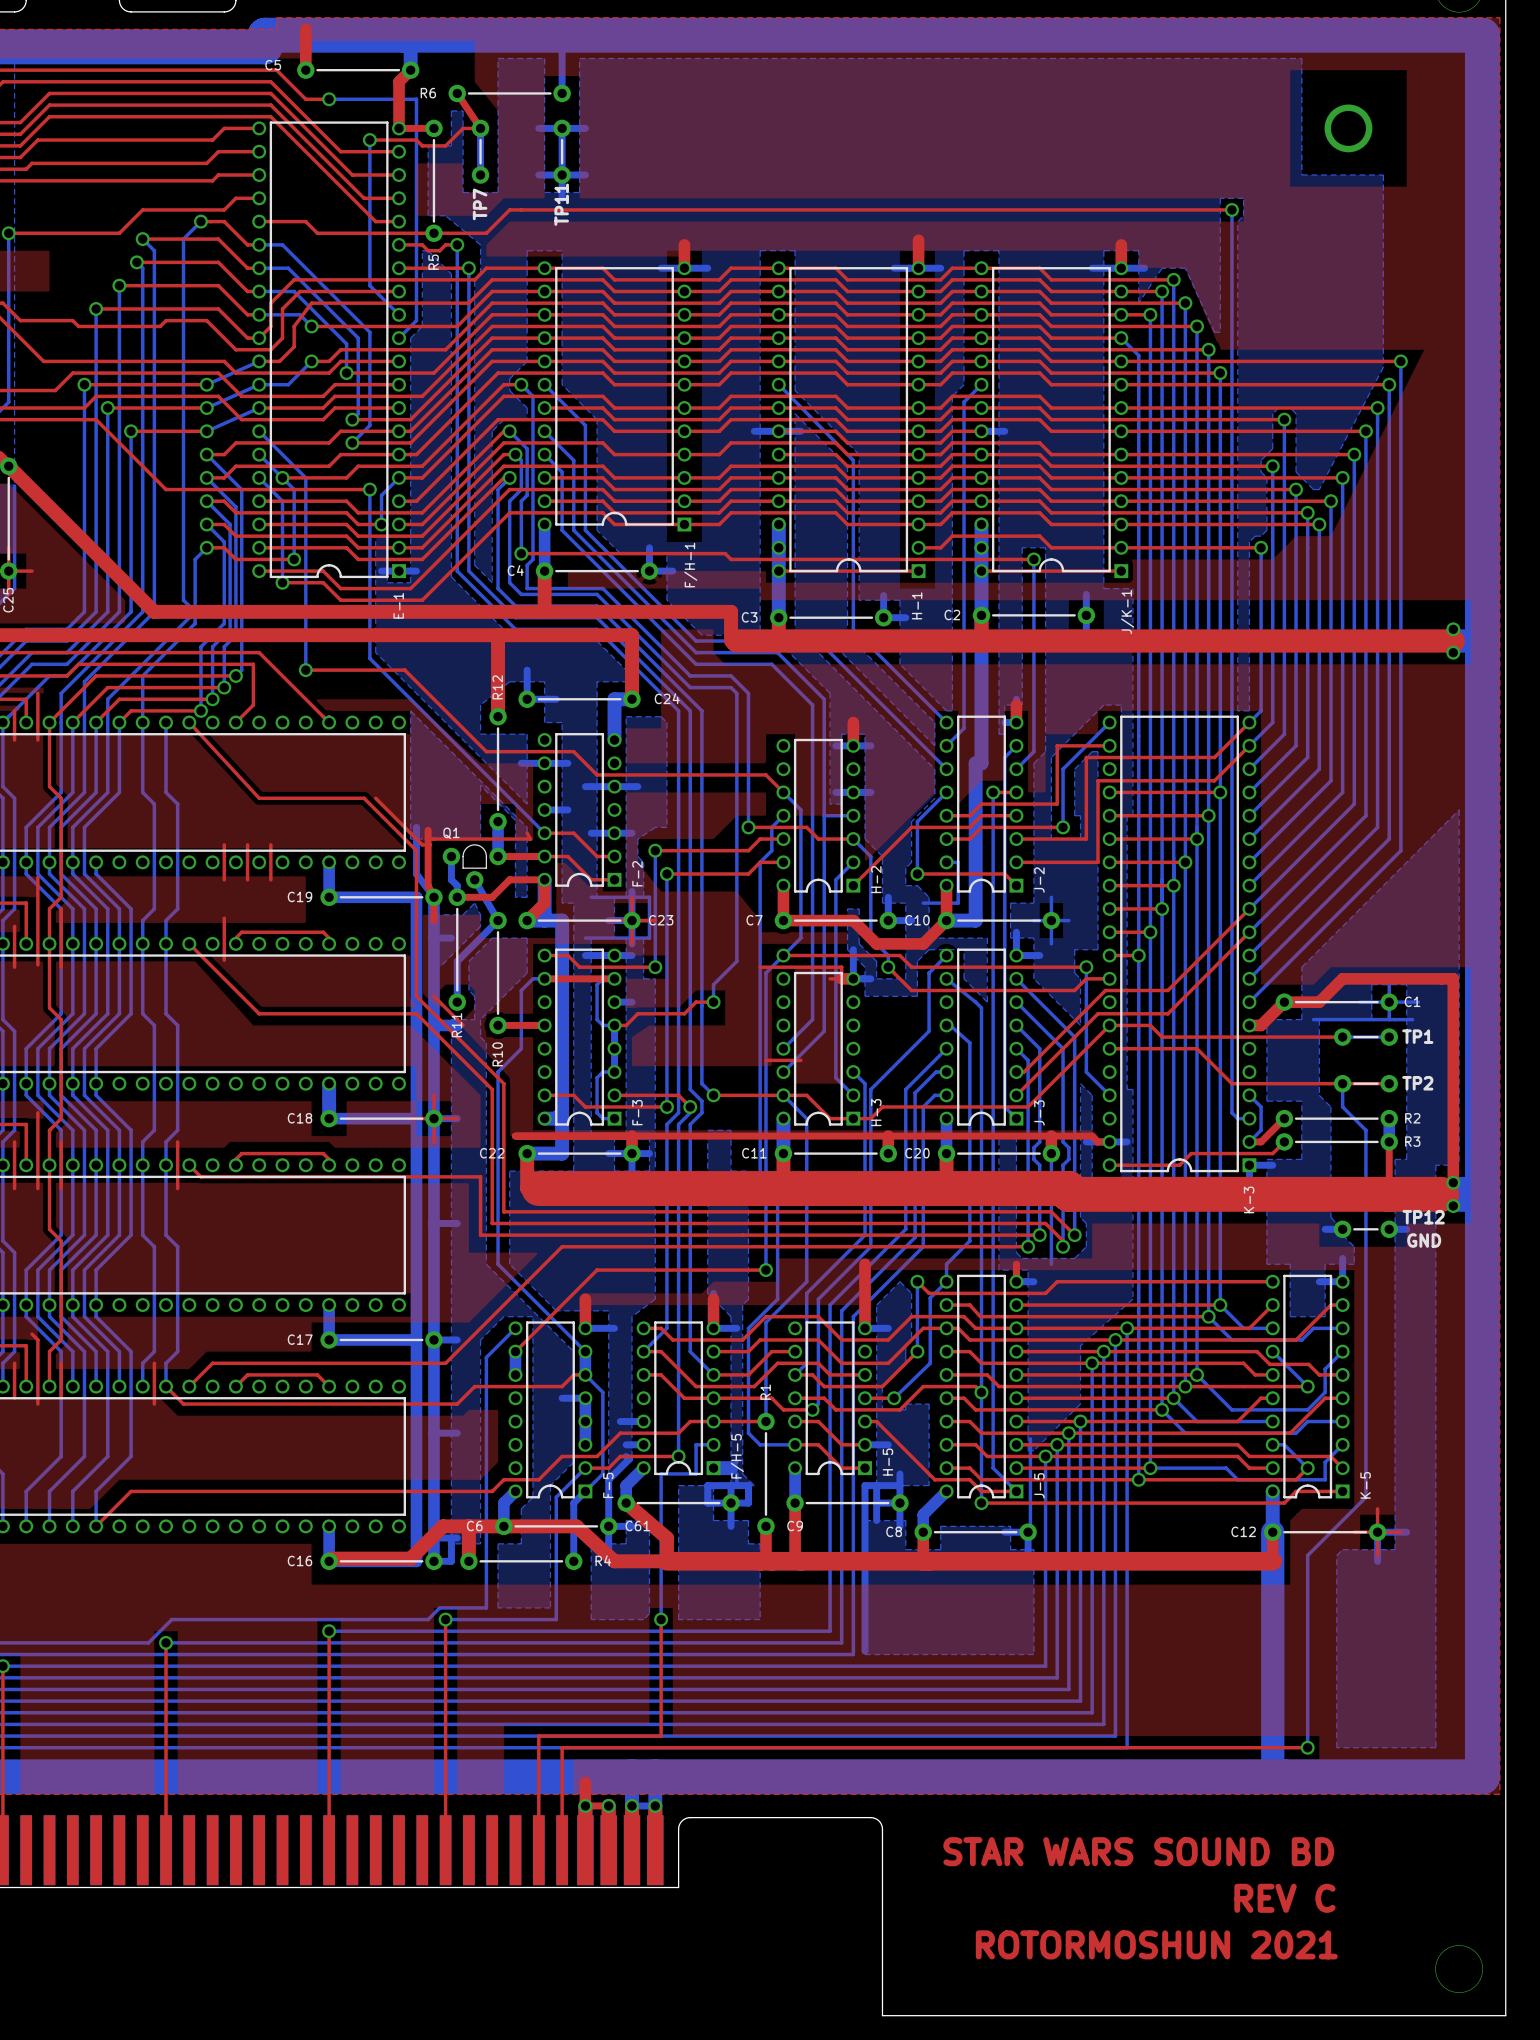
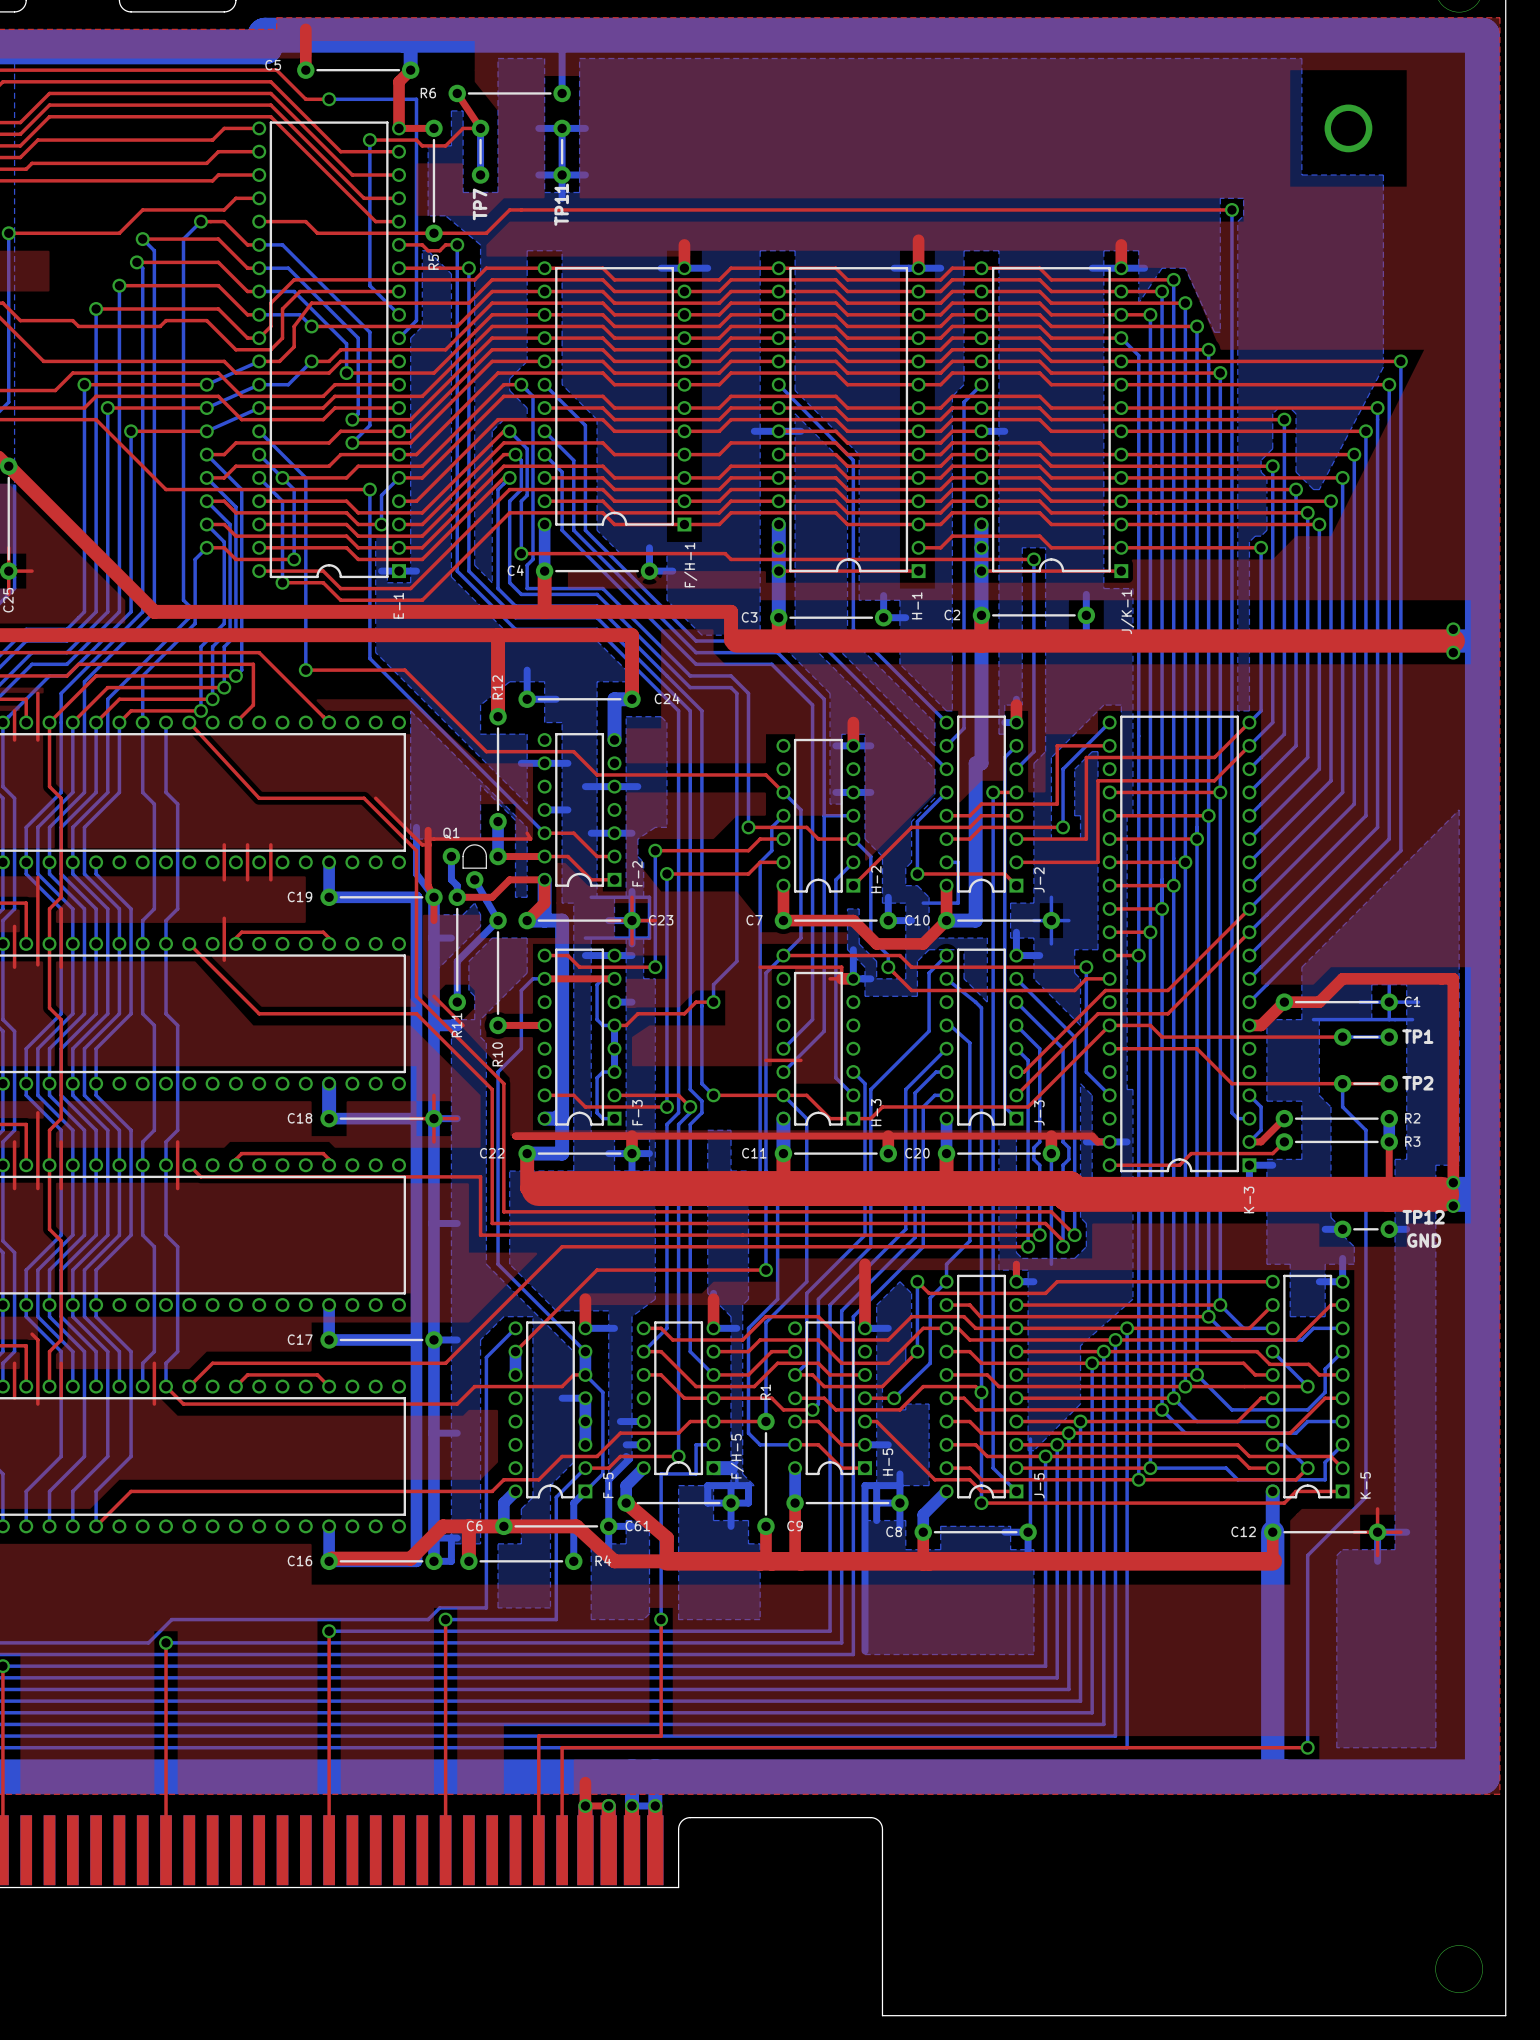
text: STAR WARS SOUND BD (1138, 1851) -> none
text: REV C (1284, 1898) -> none
text: ROTORMOSHUN 2021 (1156, 1944) -> none

